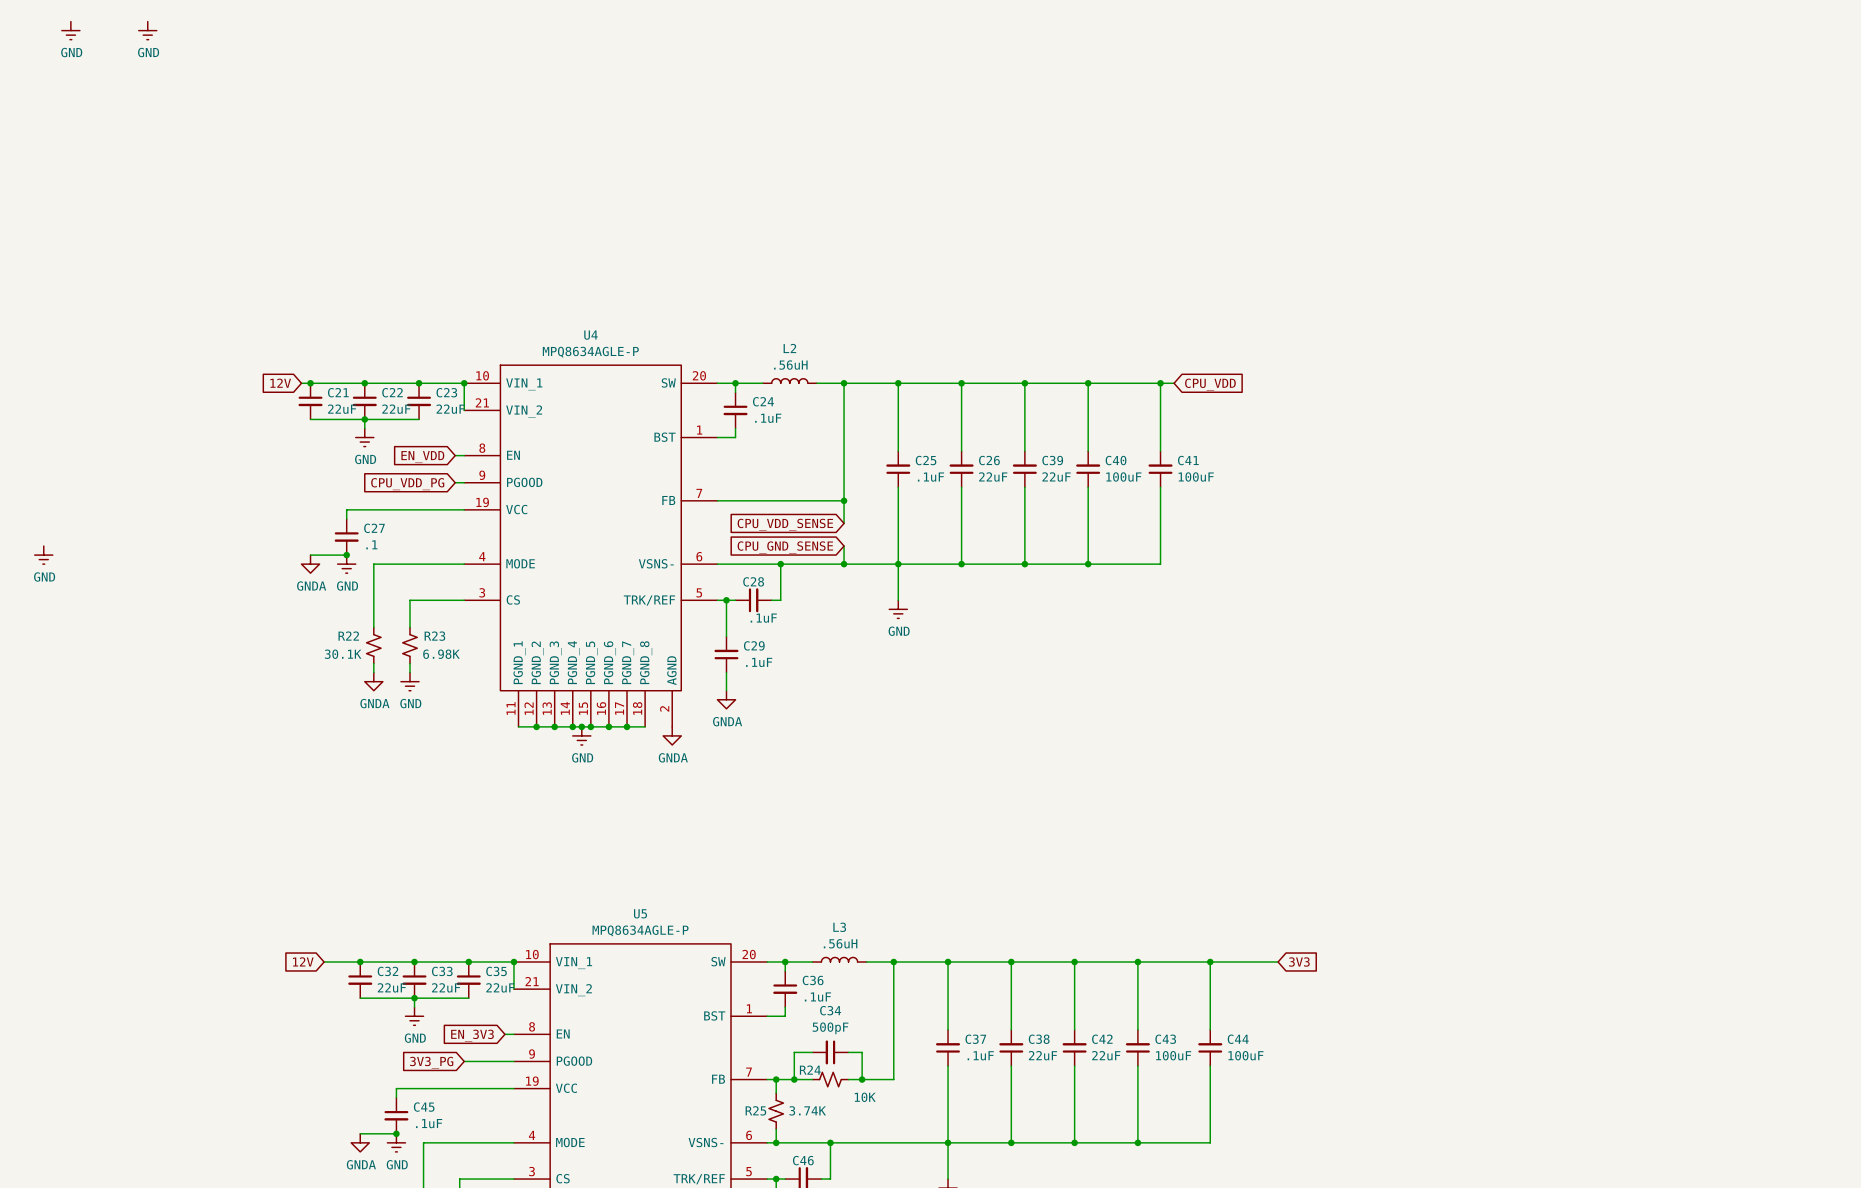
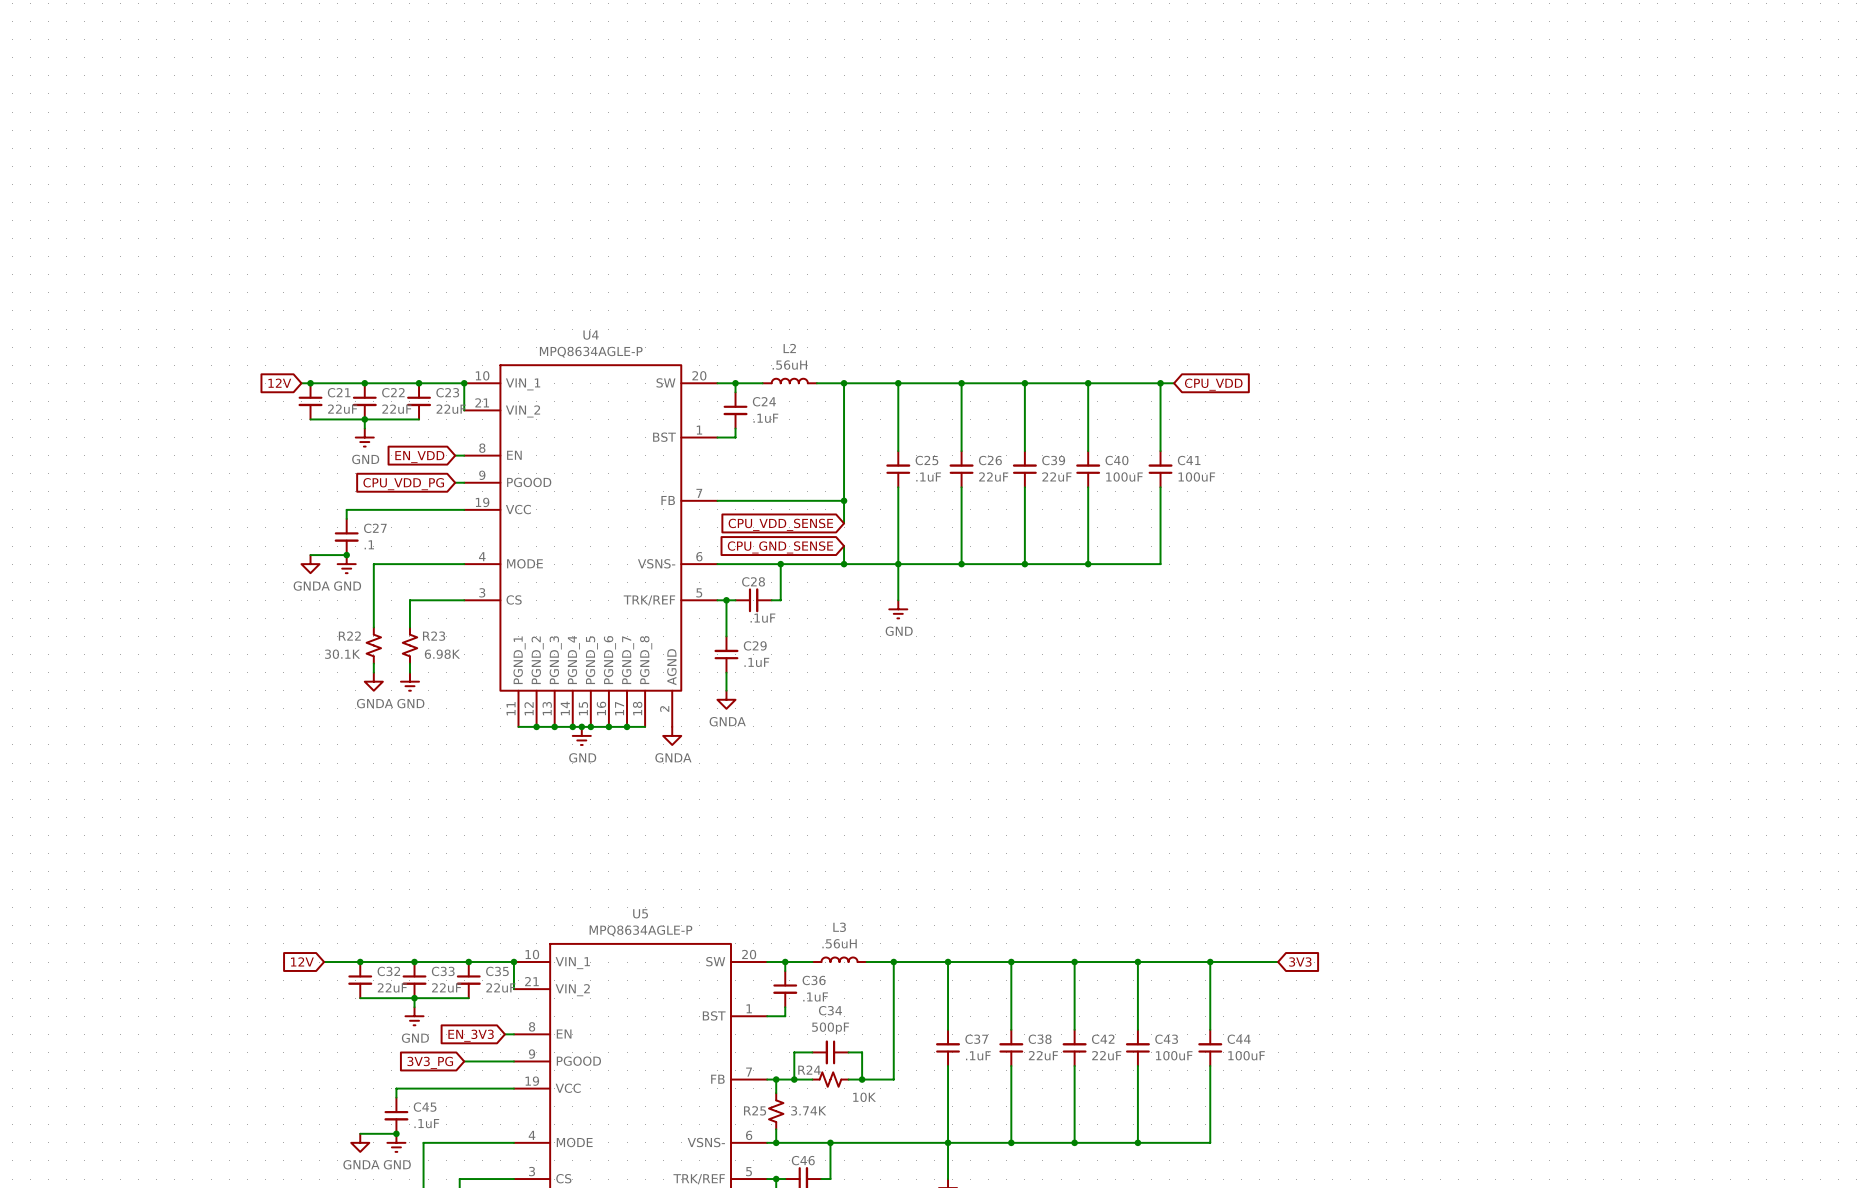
power symbol: GND (70, 30) -> none
power symbol: GND (147, 30) -> none
power symbol: GND (43, 555) -> none

